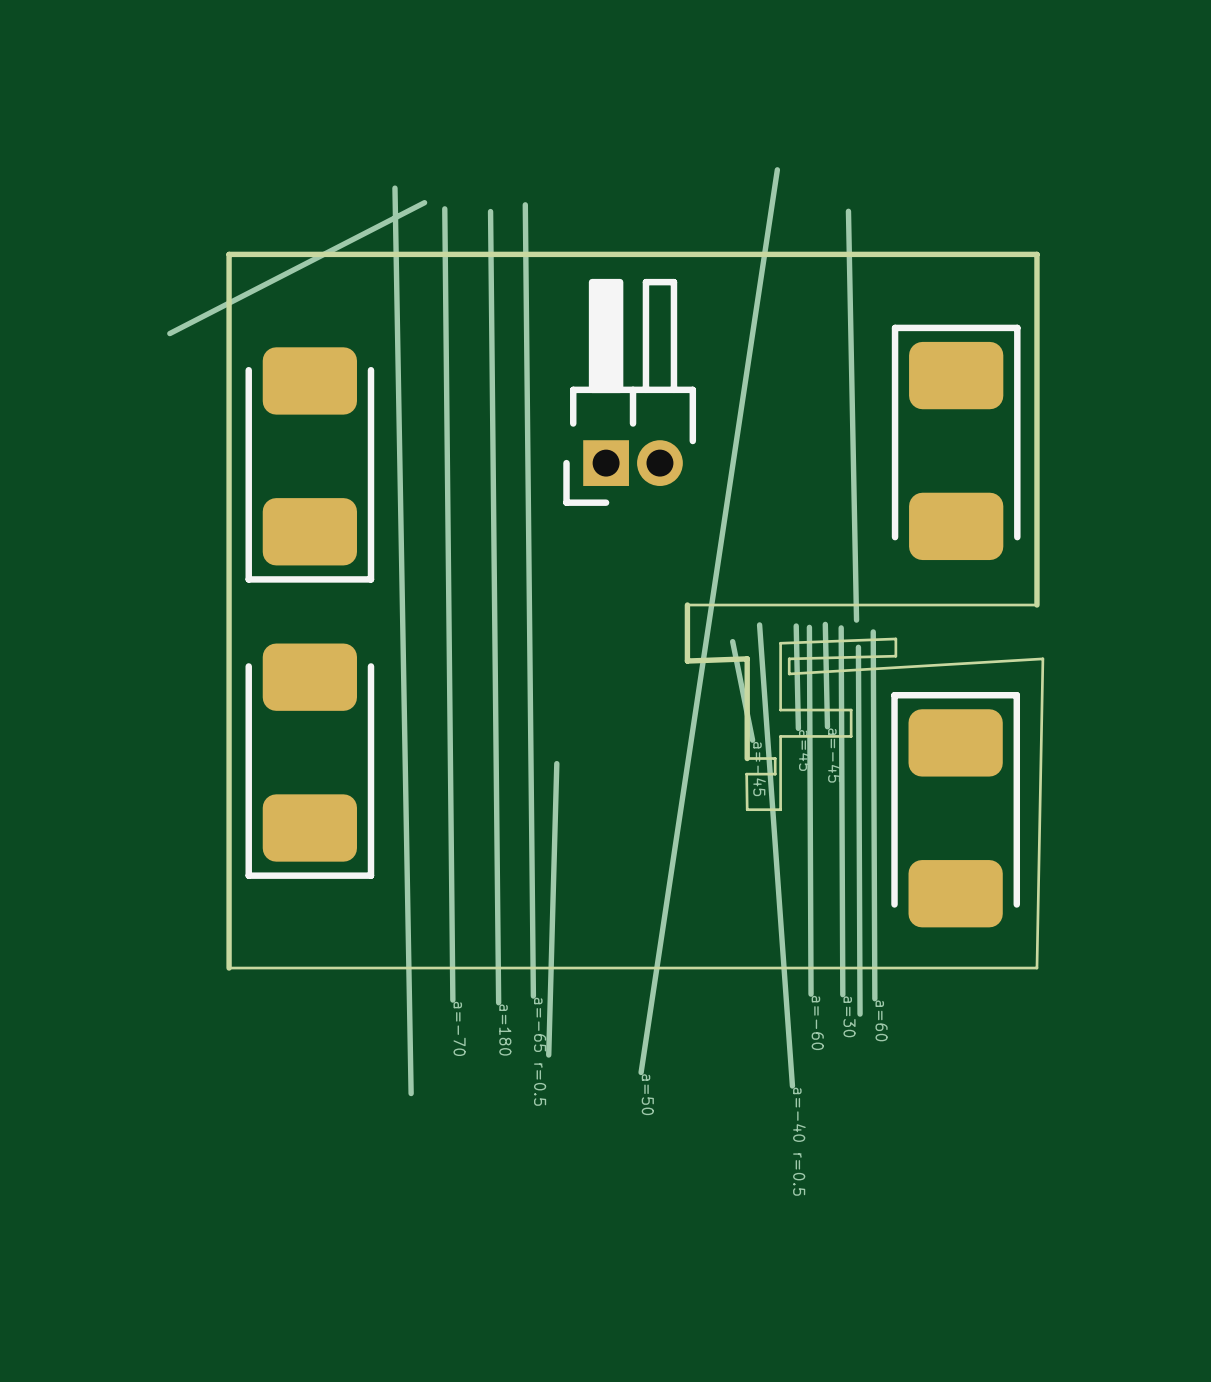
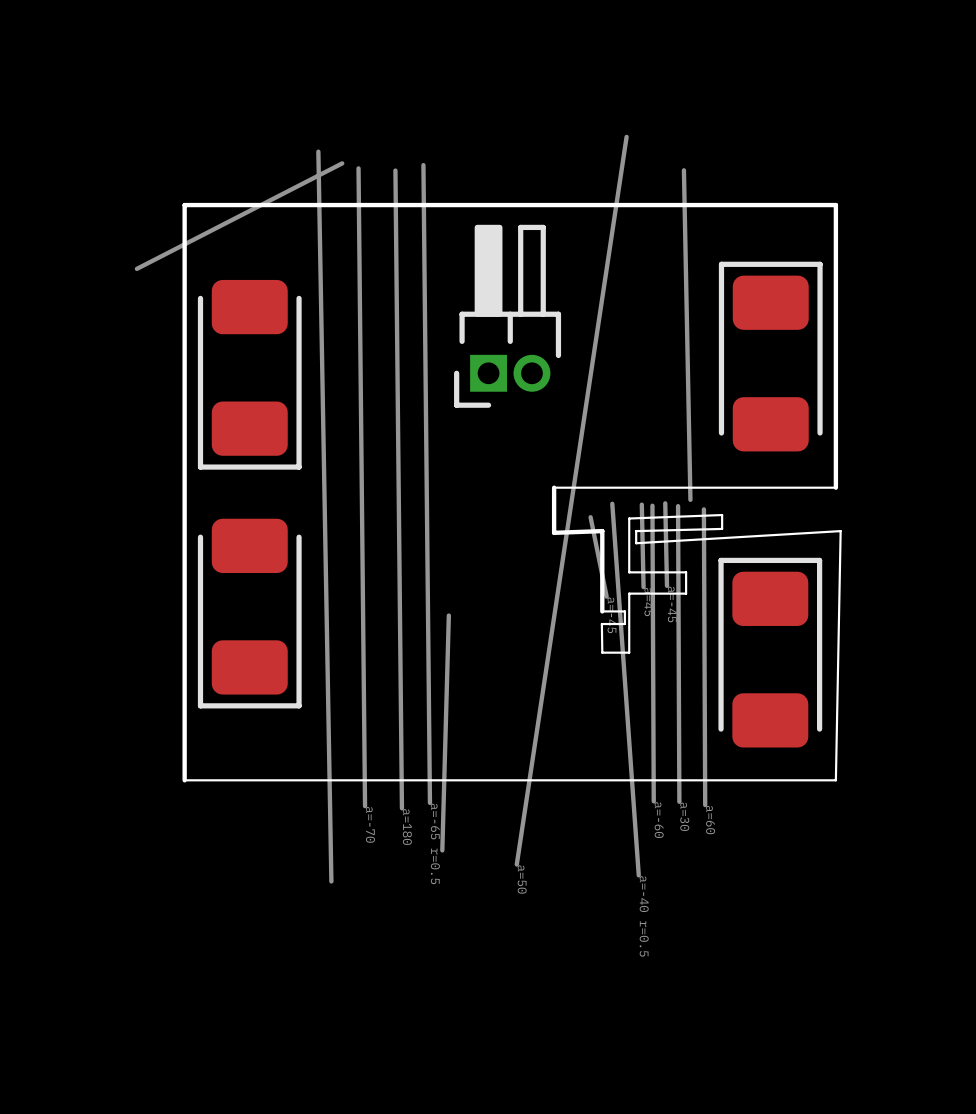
line: (858, 647) (860, 1014) -> none

